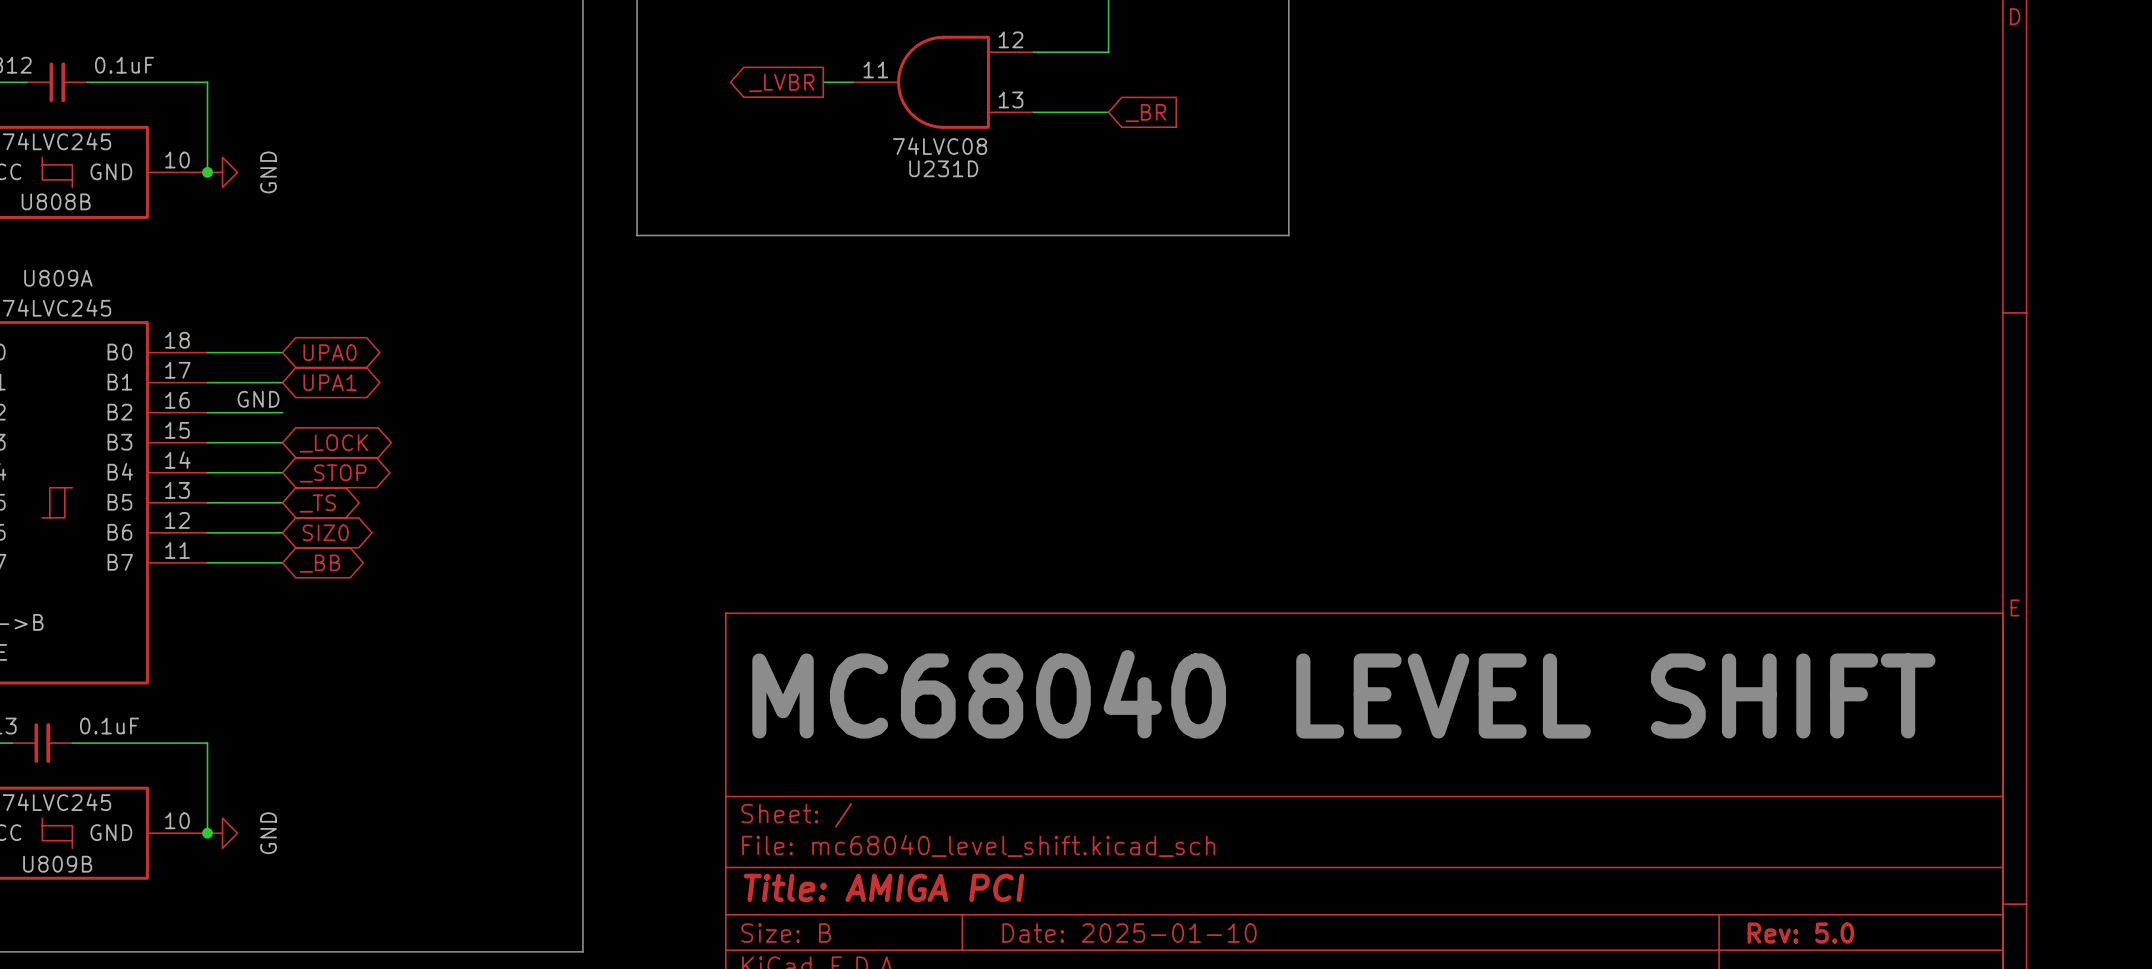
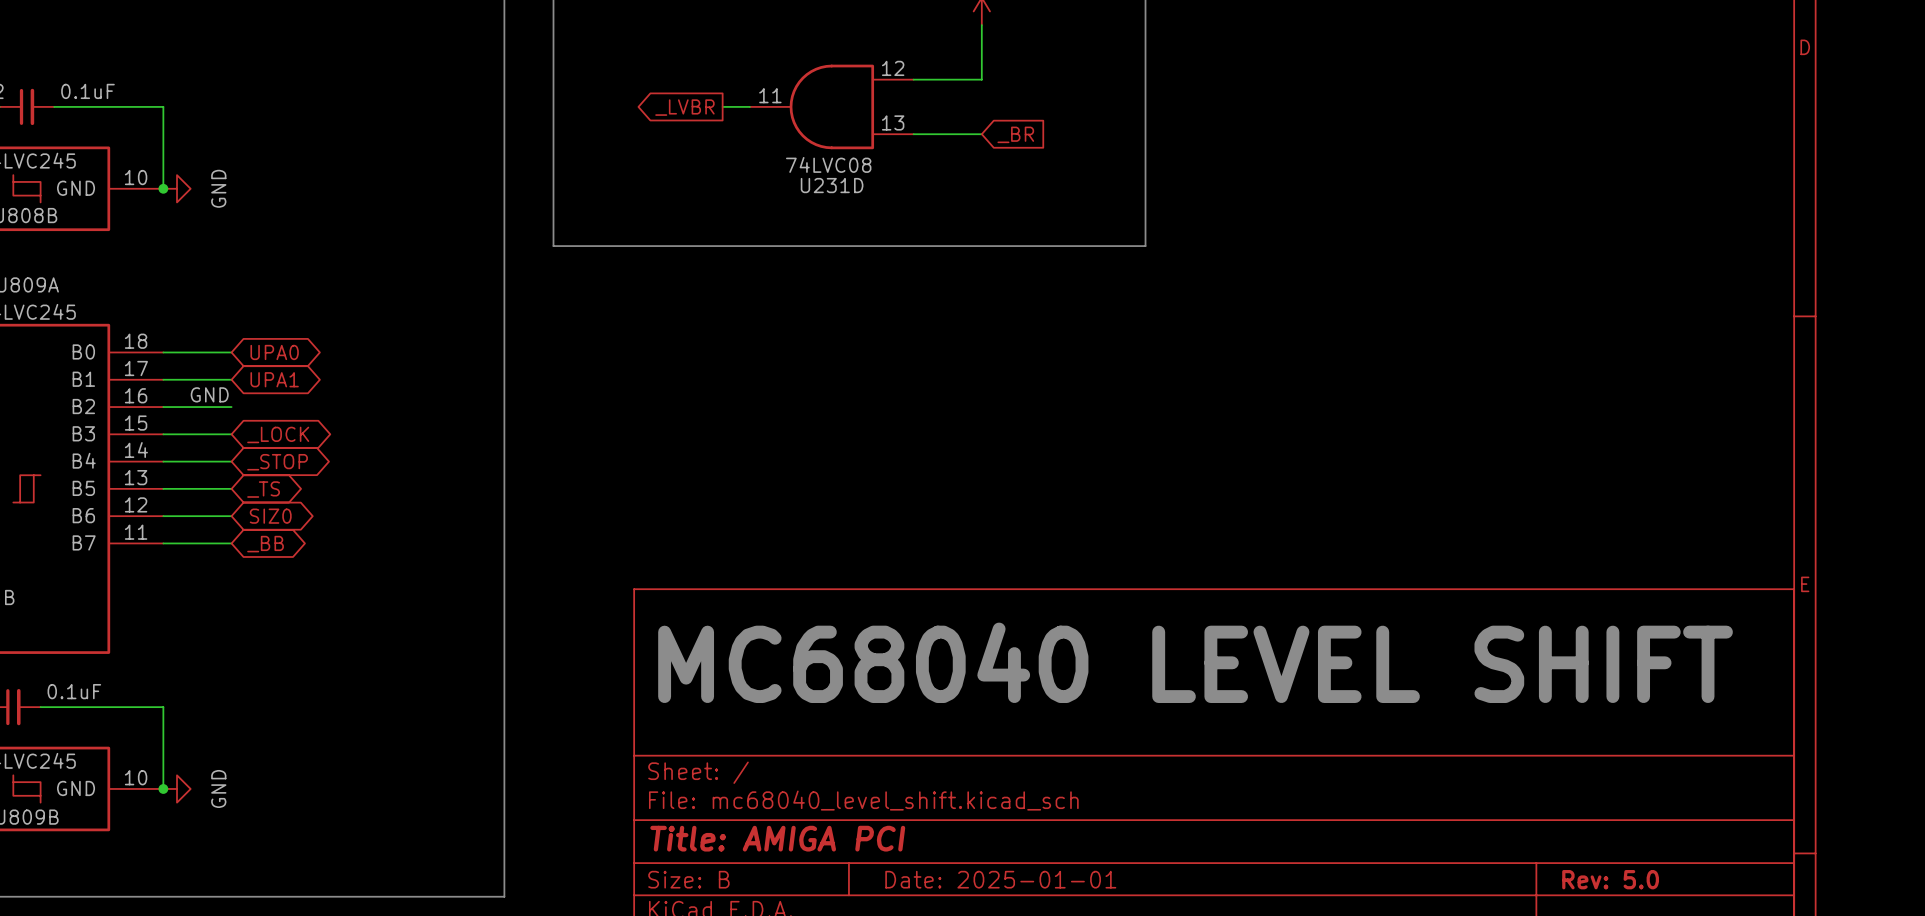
title block: Date: 2025-01-10 (1129, 933) -> Date: 2025-01-01 (1000, 879)

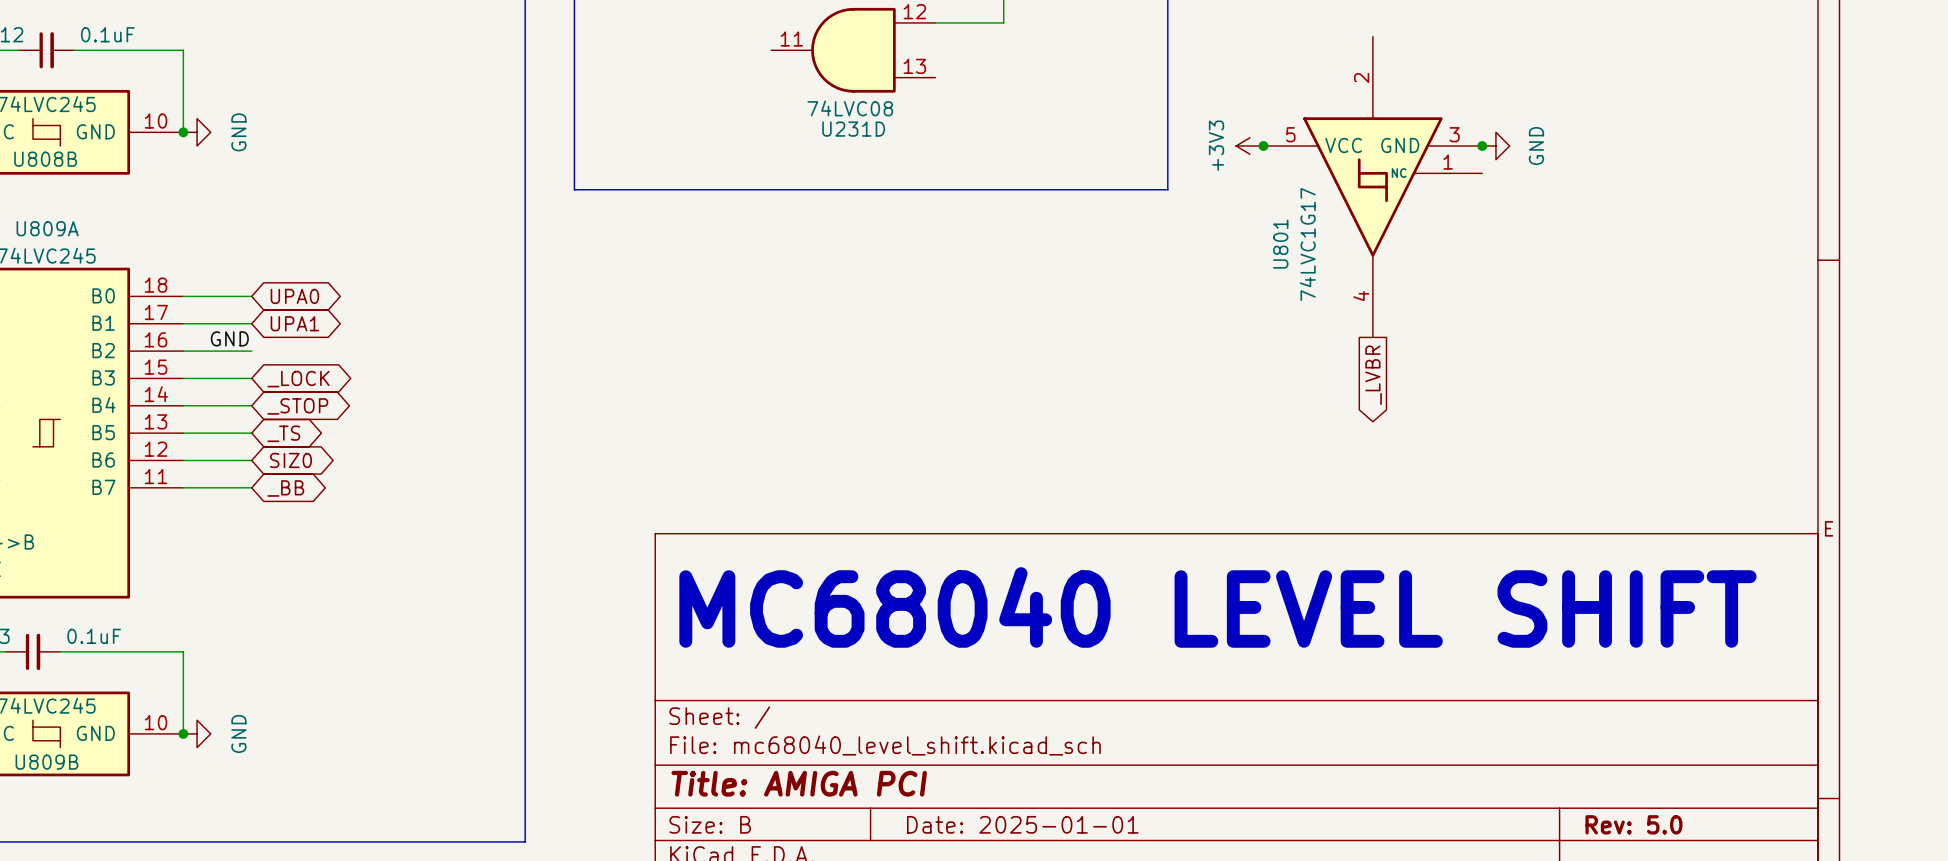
wire: (722, 106) (749, 106) -> none
global label: _LVBR (684, 107) -> none
wire: (913, 134) (981, 134) -> none
global label: _BR (1015, 134) -> none
power symbol: none -> +3V3 (1249, 146)
junction: none -> (1263, 146)
junction: none -> (1482, 146)
power symbol: none -> GND (1495, 146)
U801: none -> 74LVC1G17 (1372, 187)
global label: none -> _LVBR (1373, 375)

